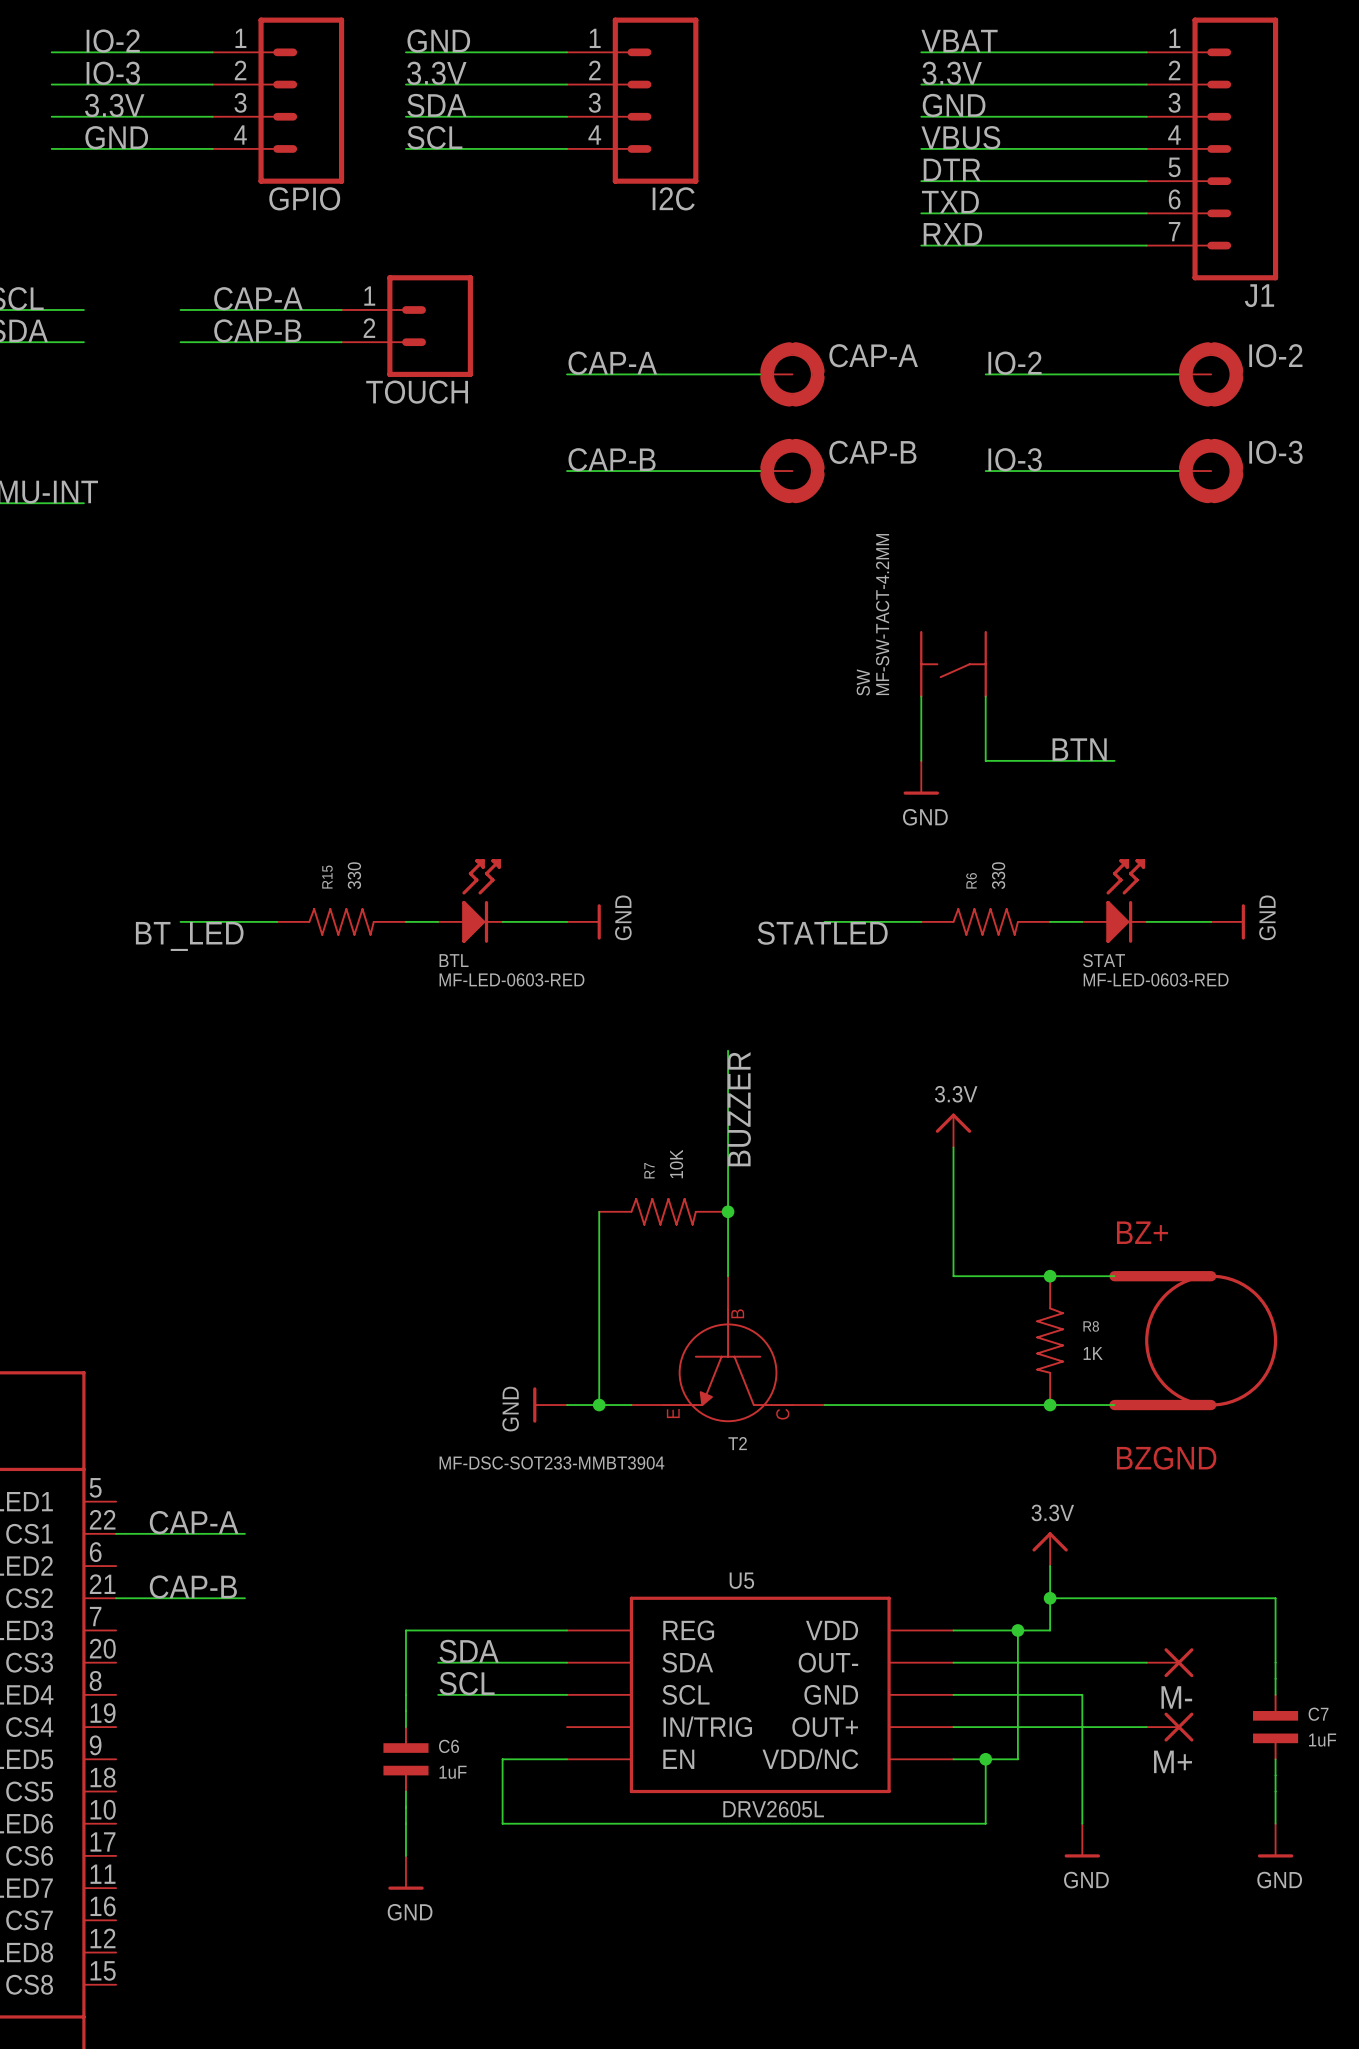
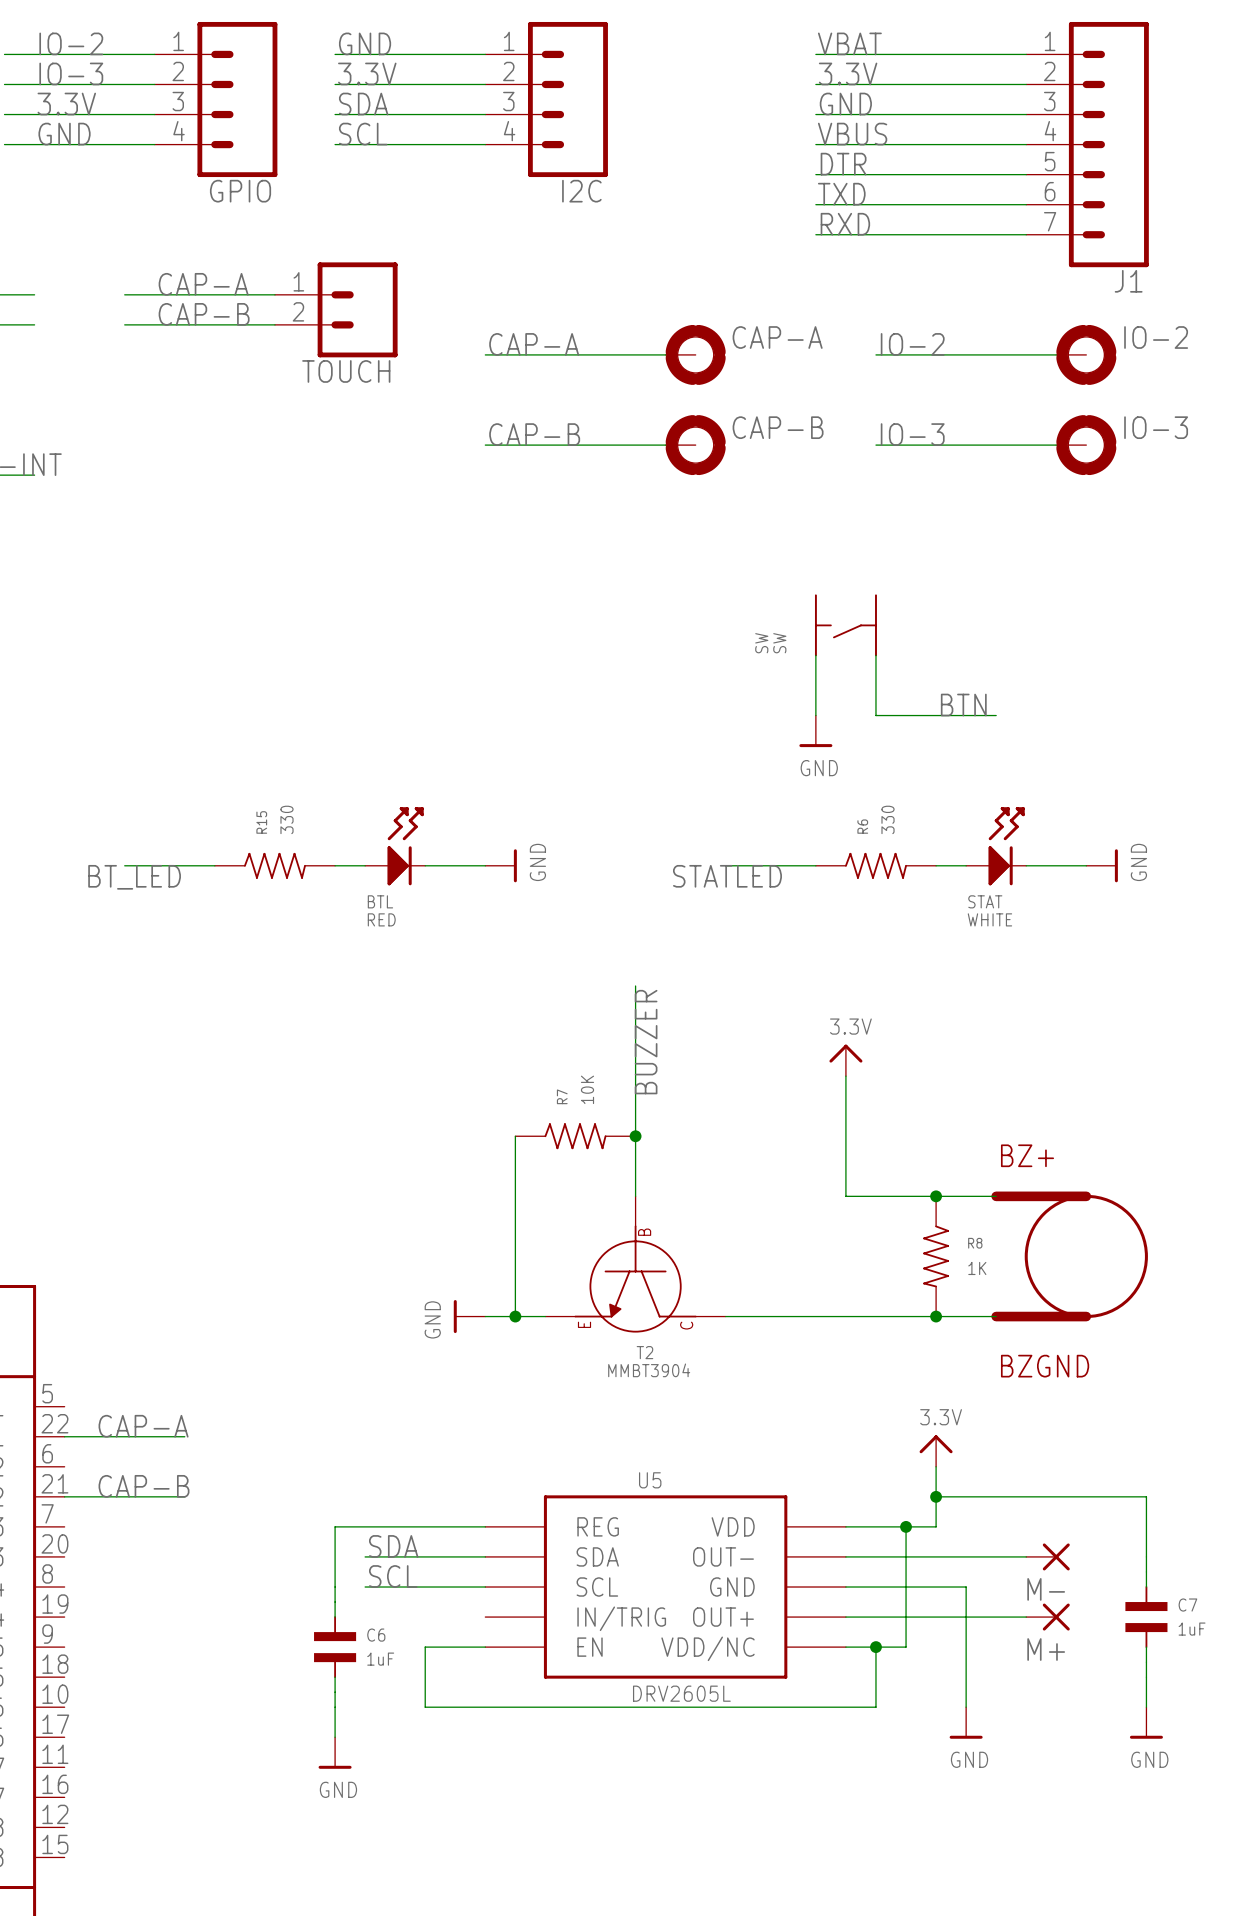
SW value: MF-SW-TACT-4.2MM (882, 614) -> SW (779, 643)
BTL value: MF-LED-0603-RED (511, 979) -> RED (381, 919)
STAT value: MF-LED-0603-RED (1156, 979) -> WHITE (989, 919)
T2 value: MF-DSC-SOT233-MMBT3904 (551, 1462) -> MMBT3904 (649, 1370)

